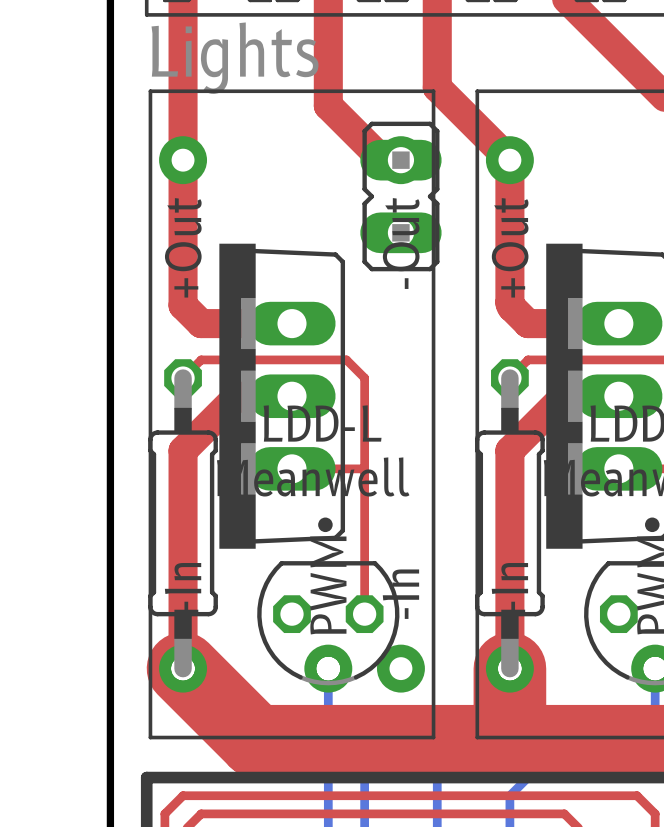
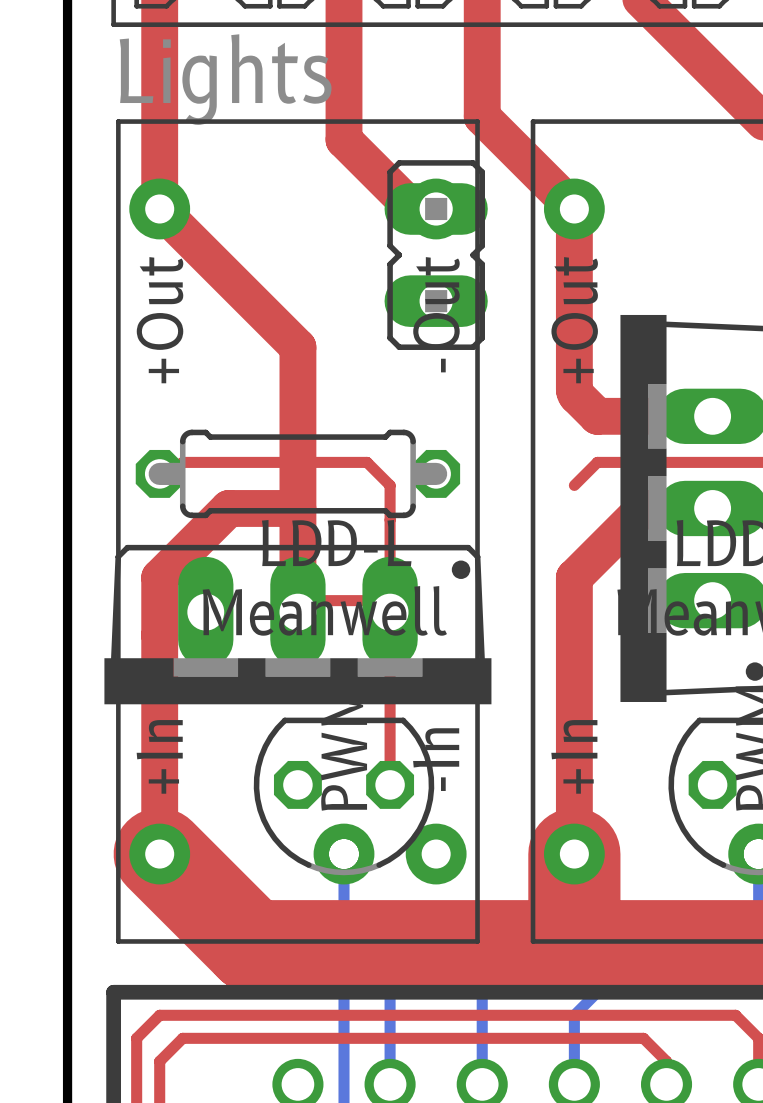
top track: (183, 160) (183, 305) (201, 323) (292, 323) -> (159, 208) (297, 347) (297, 612)
part: none -> (297, 473)
part rotation: 0° (282, 396) -> 90° counterclockwise (297, 624)
part: (183, 523) -> none
part: (509, 523) -> none

